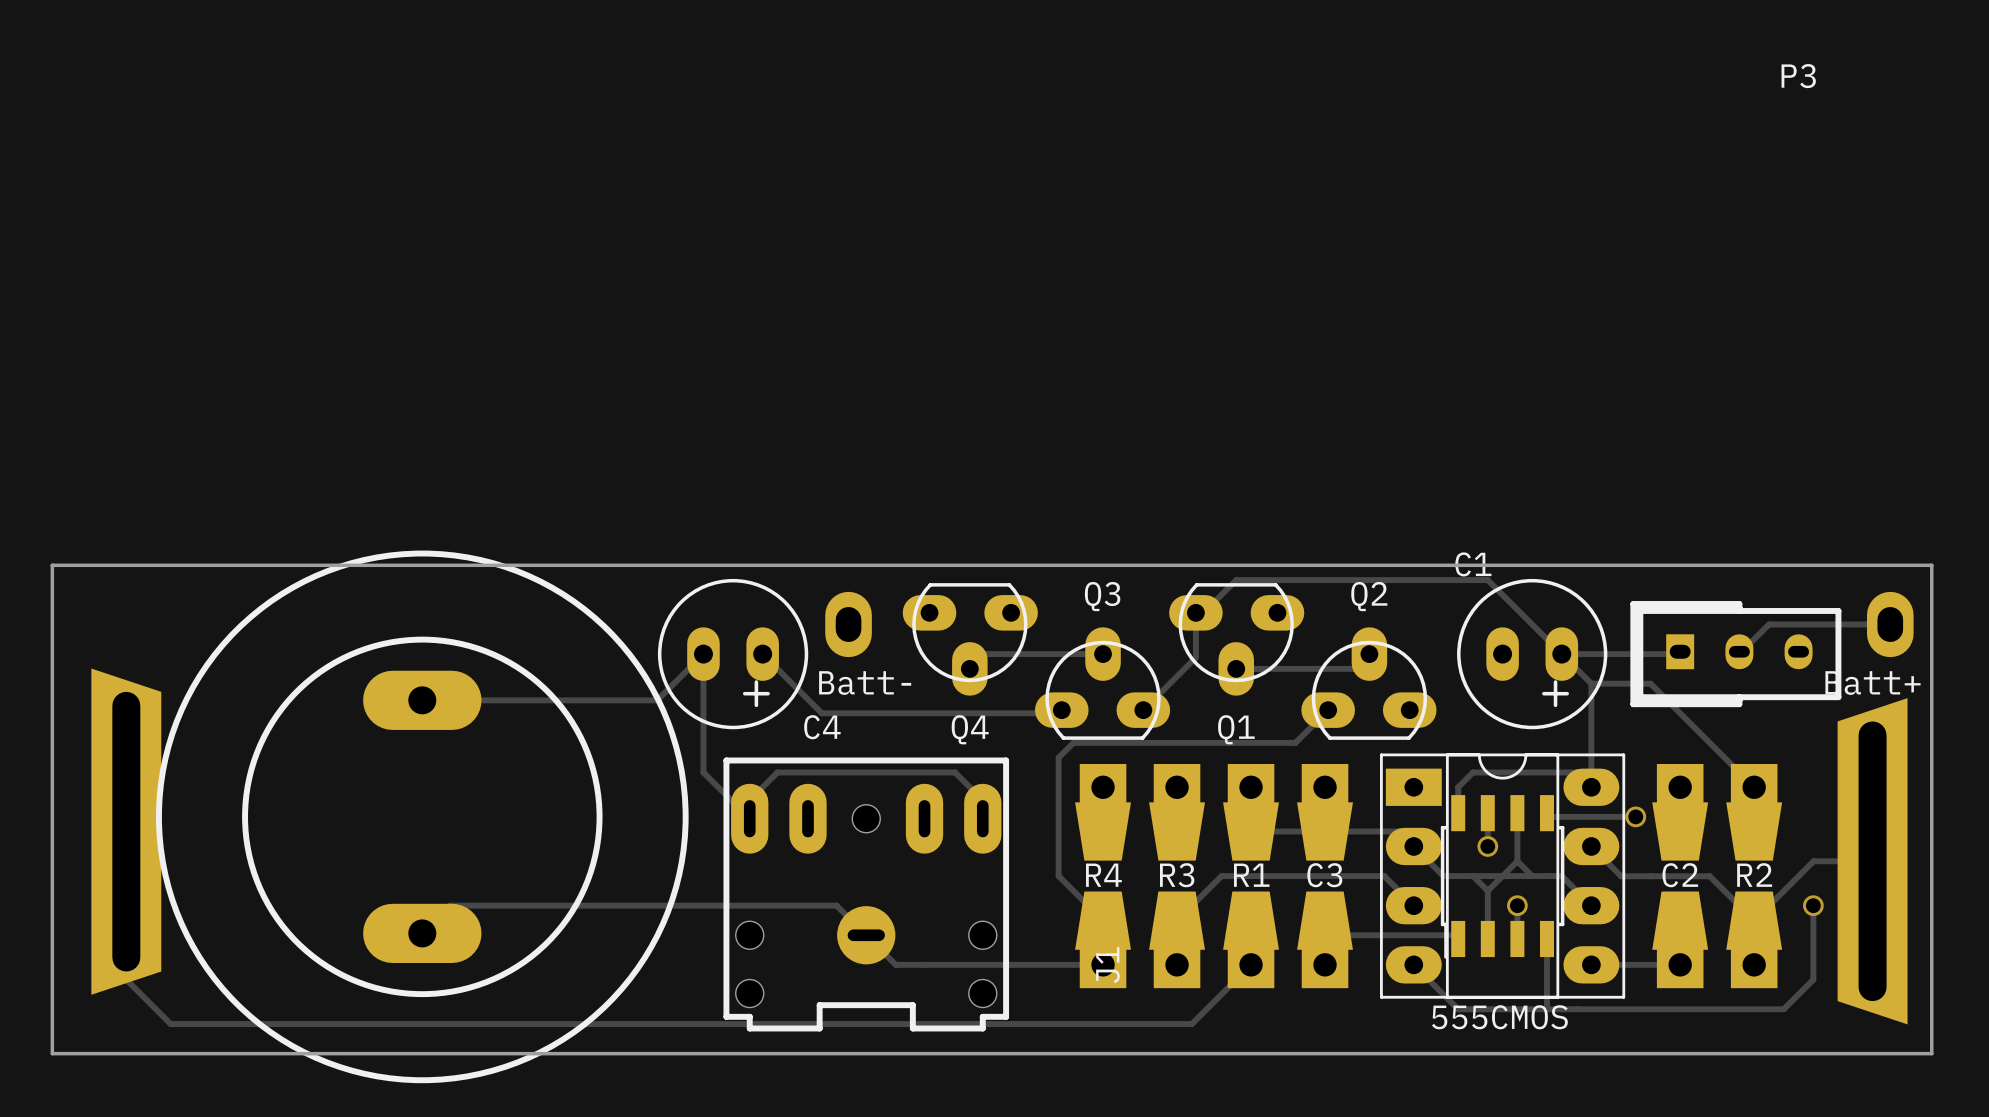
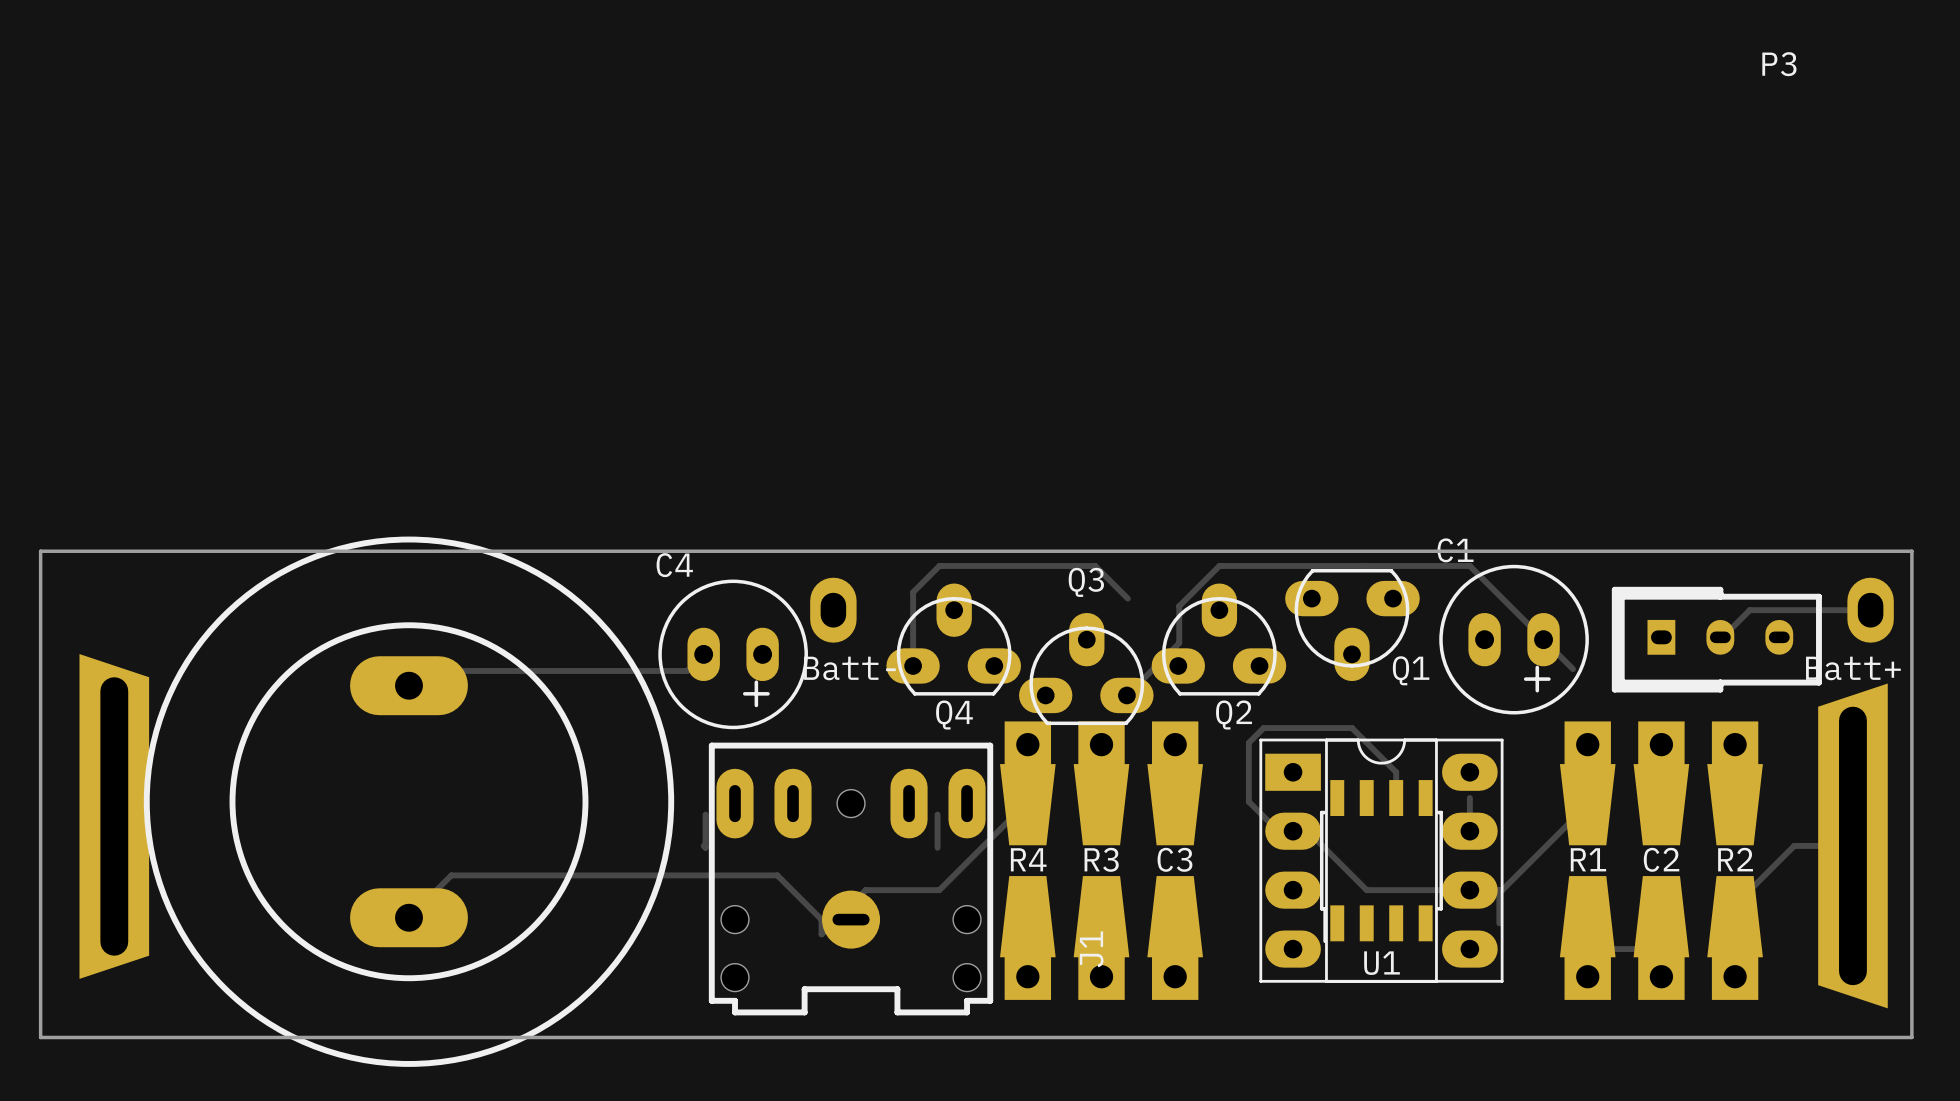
Q2 name position: Q2 (1369, 596) -> Q2 (1234, 714)
track: none -> (1127, 598) (1095, 565) (939, 565) (913, 592) (913, 665)
Q4 rotation: 0° (970, 639) -> 180° (953, 639)
Q1 position: (1236, 639) -> (1352, 625)
track: (1680, 651) (1677, 654) (1561, 654) -> none
C4 position: (733, 654) -> (733, 654)
track: (762, 654) (821, 713) (1058, 713) (1061, 710) -> none
track: (1103, 654) (984, 654) (969, 668) -> none
track: none -> (703, 654) (687, 670) (408, 670)
track: (1236, 668) (1354, 668) -> none
Q2 position: (1368, 683) -> (1218, 639)
track: (422, 700) (657, 700) (703, 654) (703, 772) (749, 818) (749, 800) (777, 772) (955, 772) (982, 800) (982, 818) -> none
track: (1328, 710) (1295, 742) -> (1396, 798) (1396, 772) (1351, 728) (1278, 728)
C4 name position: C4 (822, 727) -> C4 (674, 565)
Q1 name position: Q1 (1236, 729) -> Q1 (1411, 670)
track: (1280, 742) (1073, 742) (1058, 757) (1058, 876) (1103, 920) (1103, 964) (895, 964) (836, 905) (450, 905) -> (1027, 804) (1024, 804) (939, 890) (865, 890) (821, 934) (821, 919) (777, 875) (451, 875) (436, 890)
track: none -> (1263, 728) (1248, 742) (1248, 801) (1278, 831) (1307, 831) (1366, 890) (1502, 890) (1587, 804) (1587, 744)
R4 footprint: [1075, 763, 1131, 989] -> [1000, 721, 1056, 1000]
R3 footprint: [1149, 763, 1205, 989] -> [1073, 721, 1130, 1000]
R1 footprint: [1223, 763, 1279, 989] -> [1559, 721, 1616, 1000]
C3 footprint: [1297, 763, 1353, 989] -> [1147, 721, 1204, 1000]
C2 footprint: [1652, 763, 1709, 989] -> [1633, 721, 1690, 1000]
R2 footprint: [1726, 763, 1783, 989] -> [1707, 721, 1763, 1000]
track: (1251, 787) (1251, 831) (1398, 831) (1443, 876) (1561, 876) (1591, 905) -> none
track: (1754, 787) (1650, 683) (1591, 683) (1591, 787) (1576, 772) (1473, 772) (1458, 787) (1458, 813) -> none
track: (1517, 813) (1517, 861) -> none
track: (1547, 813) (1550, 816) (1635, 816) -> none
via: (1635, 816) -> none
track: none -> (705, 814) (705, 847) (703, 845)
track: none -> (937, 814) (937, 847)
track: (126, 831) (126, 979) (170, 1024) (1191, 1024) (1251, 964) (1251, 920) -> none
via: (1487, 846) -> none
track: (1591, 846) (1621, 876) (1709, 876) (1754, 920) (1754, 932) -> none
track: (1517, 861) (1532, 876) -> none
track: (1517, 861) (1487, 890) -> none
U1: none -> (1381, 860)
track: (1473, 876) (1487, 890) -> none
part position: (1502, 876) -> (1381, 861)
555CMOS: (1502, 876) -> none
track: (1487, 890) (1487, 938) -> none
track: (1413, 905) (1384, 876) (1221, 876) (1177, 920) (1177, 964) -> none
via: (1517, 905) -> none
track: (1813, 905) (1813, 979) (1783, 1009) (1458, 1009) (1413, 964) -> none
via: (1813, 905) -> none
track: (1325, 920) (1339, 935) (1454, 935) (1458, 938) -> none
track: (1547, 938) (1547, 1009) -> none

